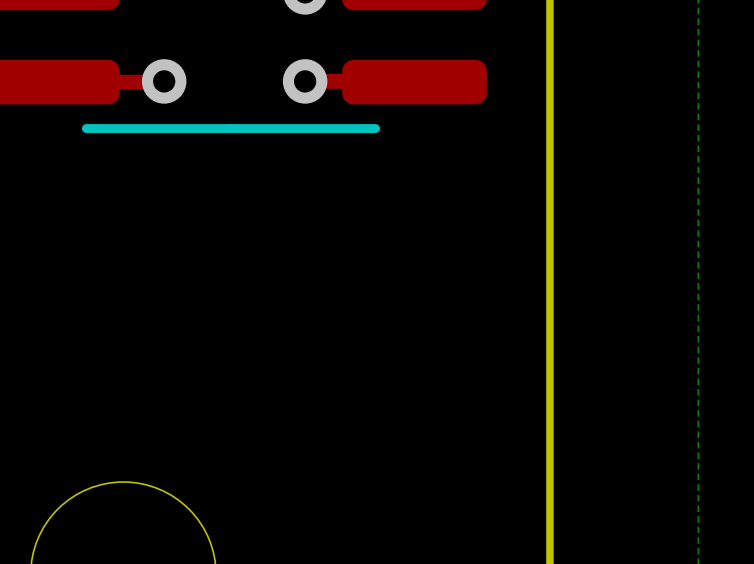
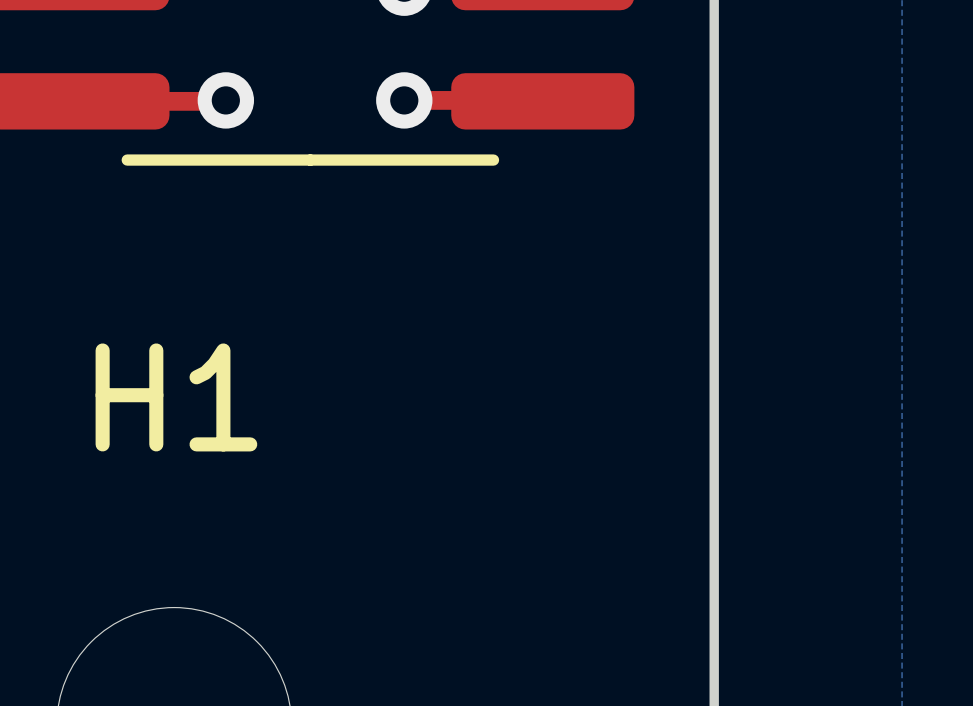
H1 name: none -> H1 (176, 397)

